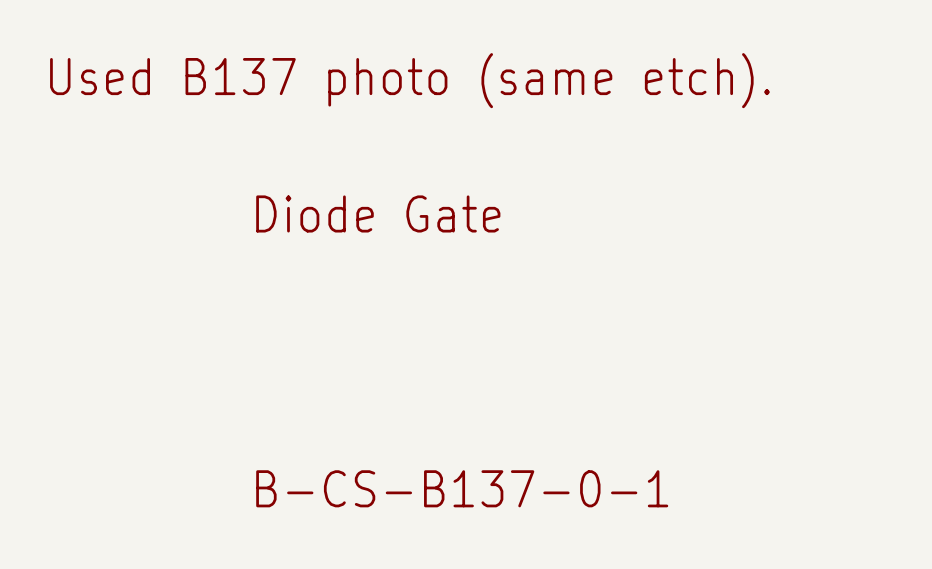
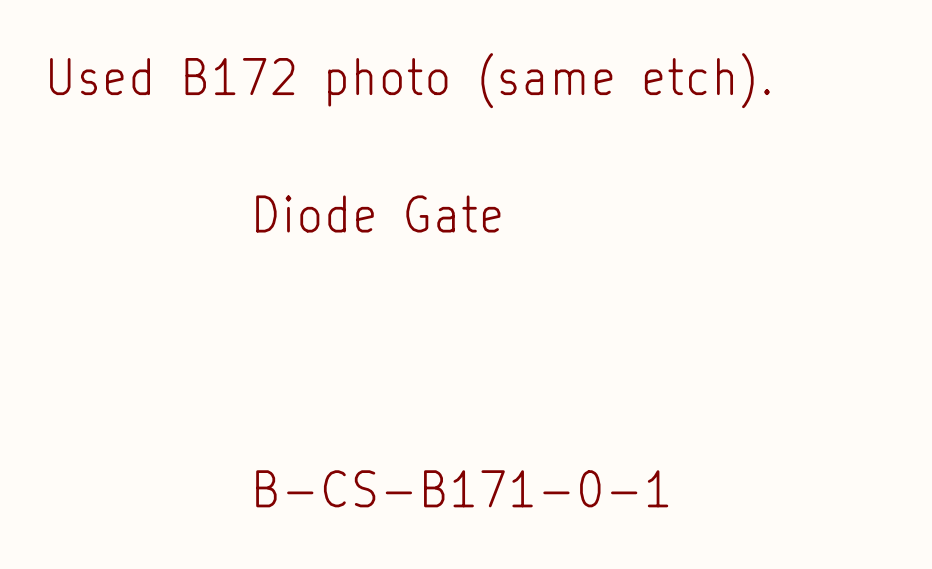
text: Used B137 photo (same etch). (409, 80) -> Used B172 photo (same etch). (409, 80)
text: B-CS-B137-0-1 (462, 488) -> B-CS-B171-0-1 (462, 488)

